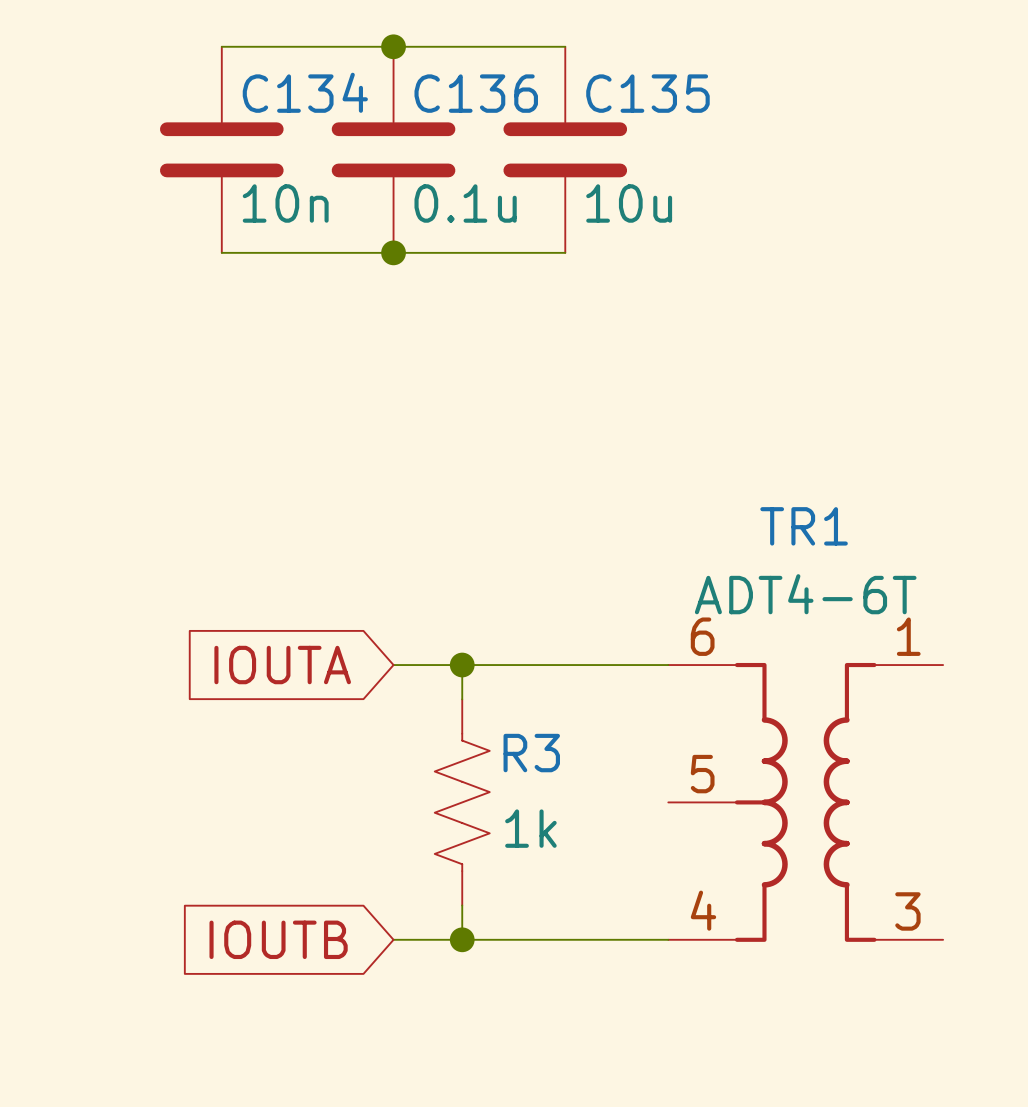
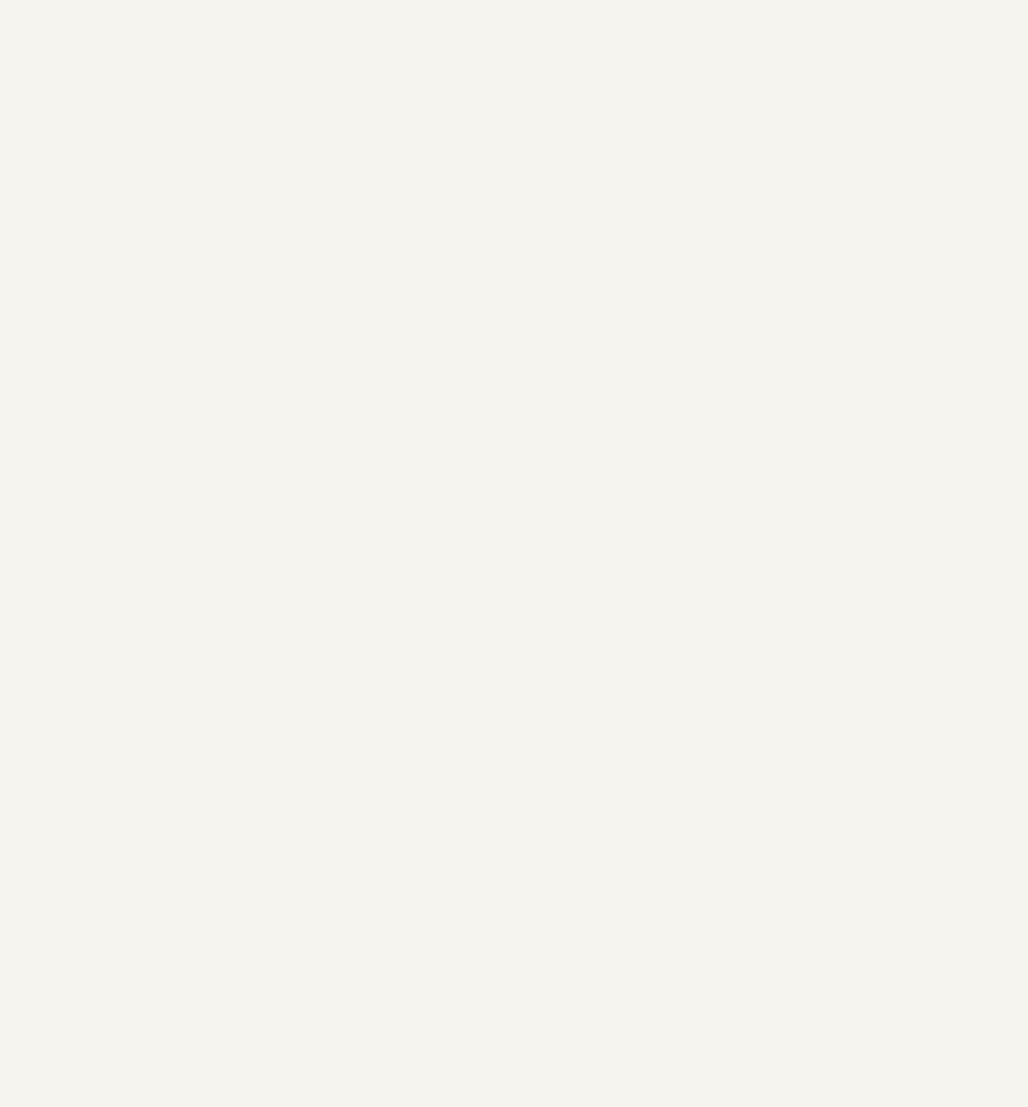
wire: (221, 46) (565, 46) -> none
junction: (393, 46) -> none
C134: 10n (221, 149) -> none
C136: 0.1u (393, 149) -> none
C135: 10u (565, 149) -> none
wire: (221, 252) (565, 252) -> none
junction: (393, 252) -> none
global label: IOUTA (282, 665) -> none
wire: (393, 665) (668, 665) -> none
wire: (462, 665) (462, 699) -> none
junction: (462, 665) -> none
R3: 1k (462, 802) -> none
TR1: ADT4-6T (805, 802) -> none
wire: (462, 905) (462, 939) -> none
global label: IOUTB (278, 939) -> none
wire: (393, 939) (668, 939) -> none
junction: (462, 939) -> none

